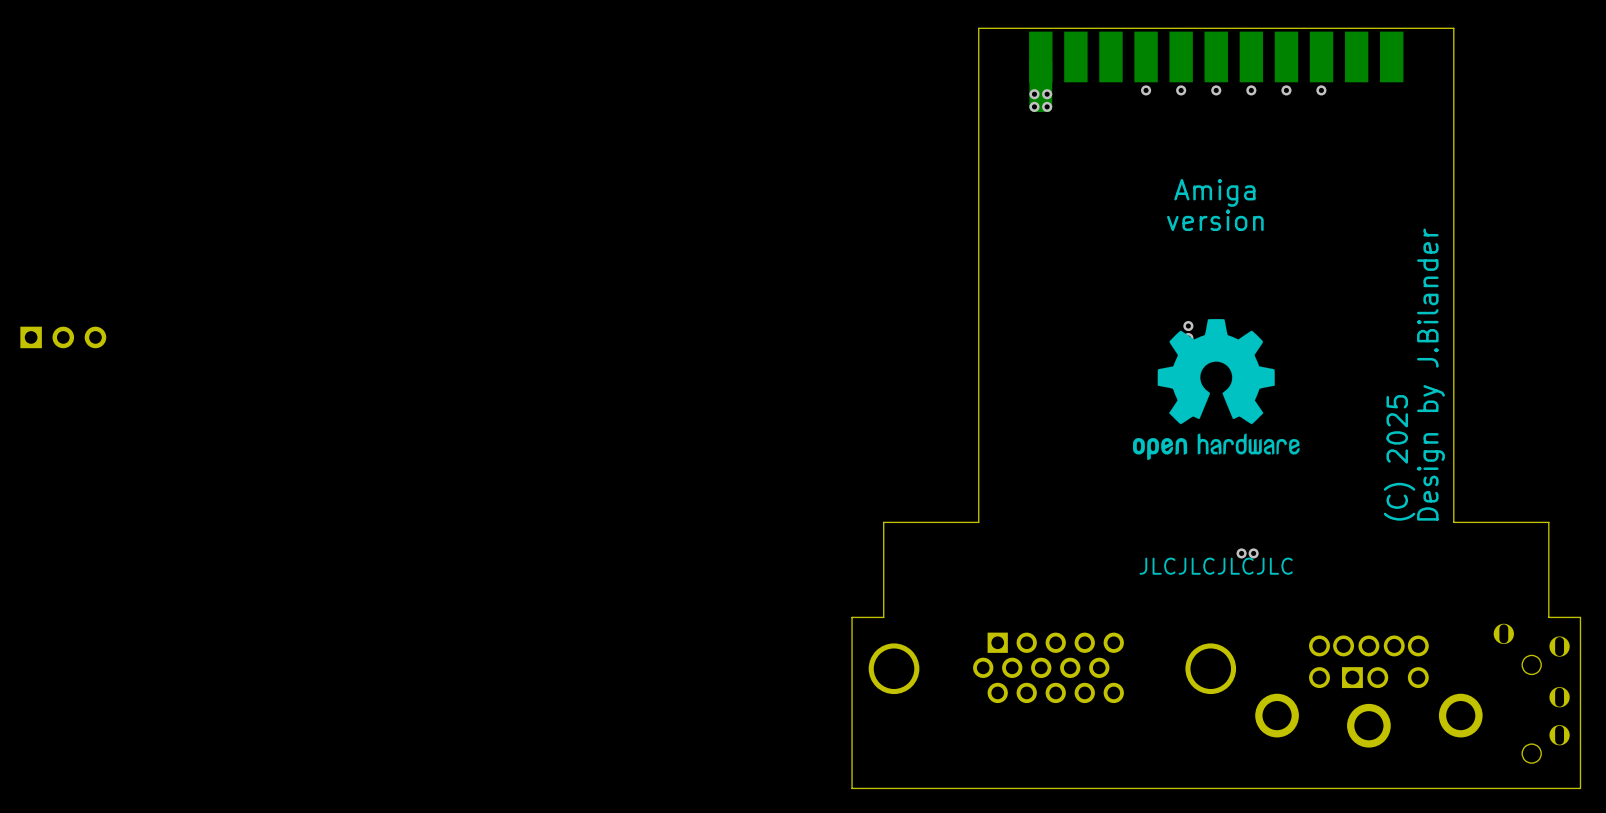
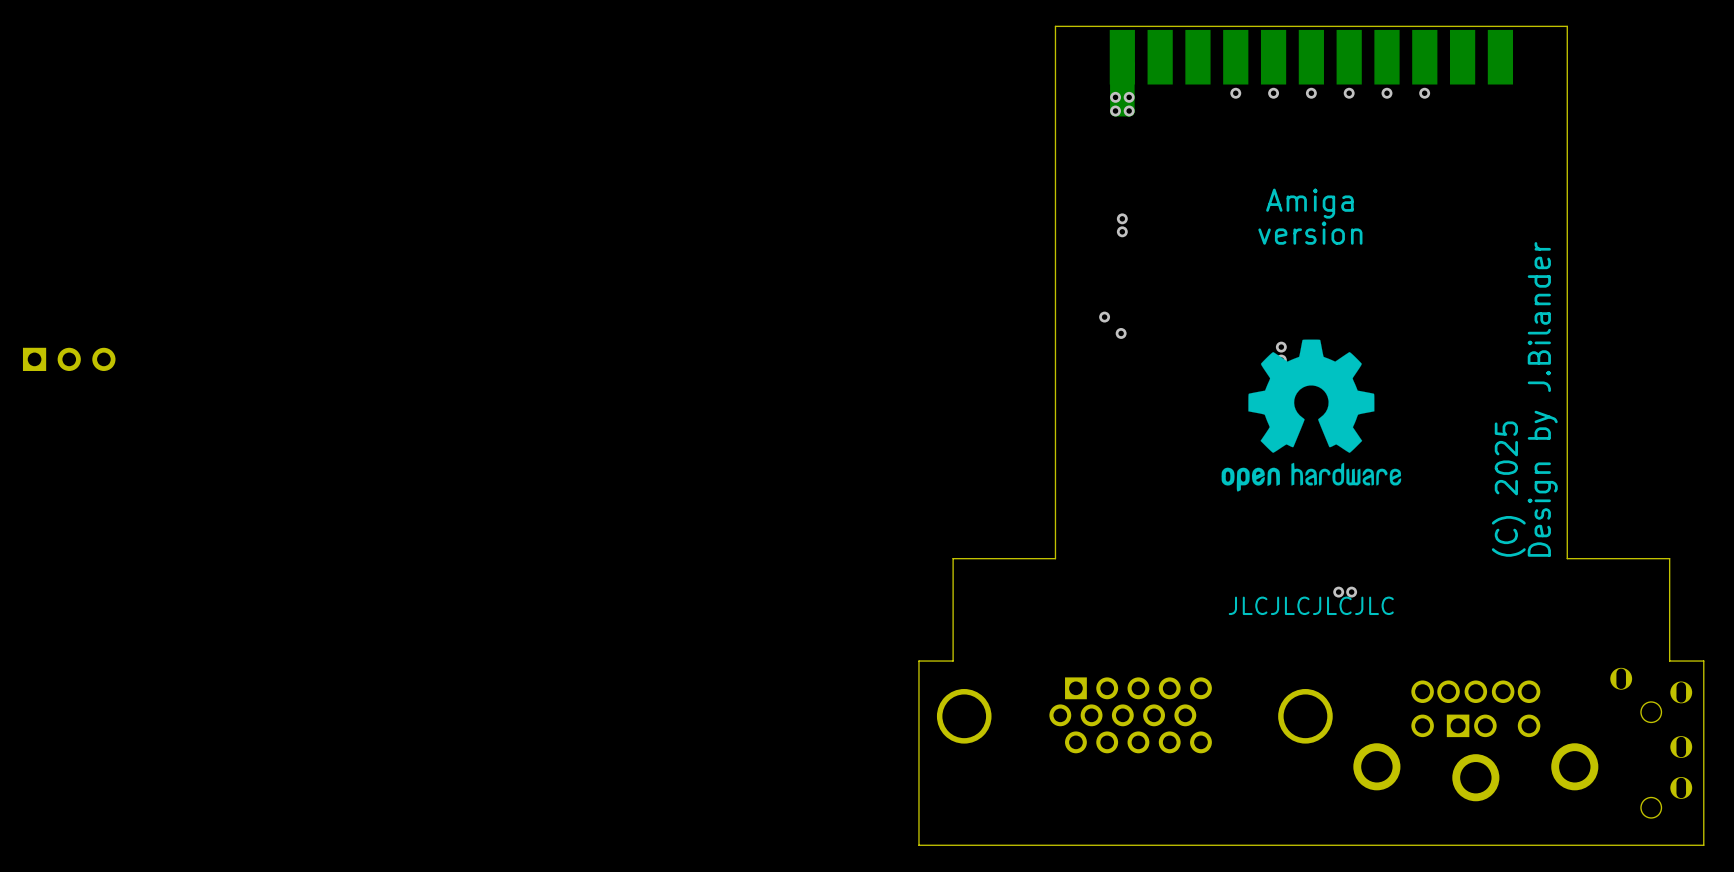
via: none -> (1122, 218)
via: none -> (1122, 231)
via: none -> (1104, 317)
via: none -> (1121, 333)

